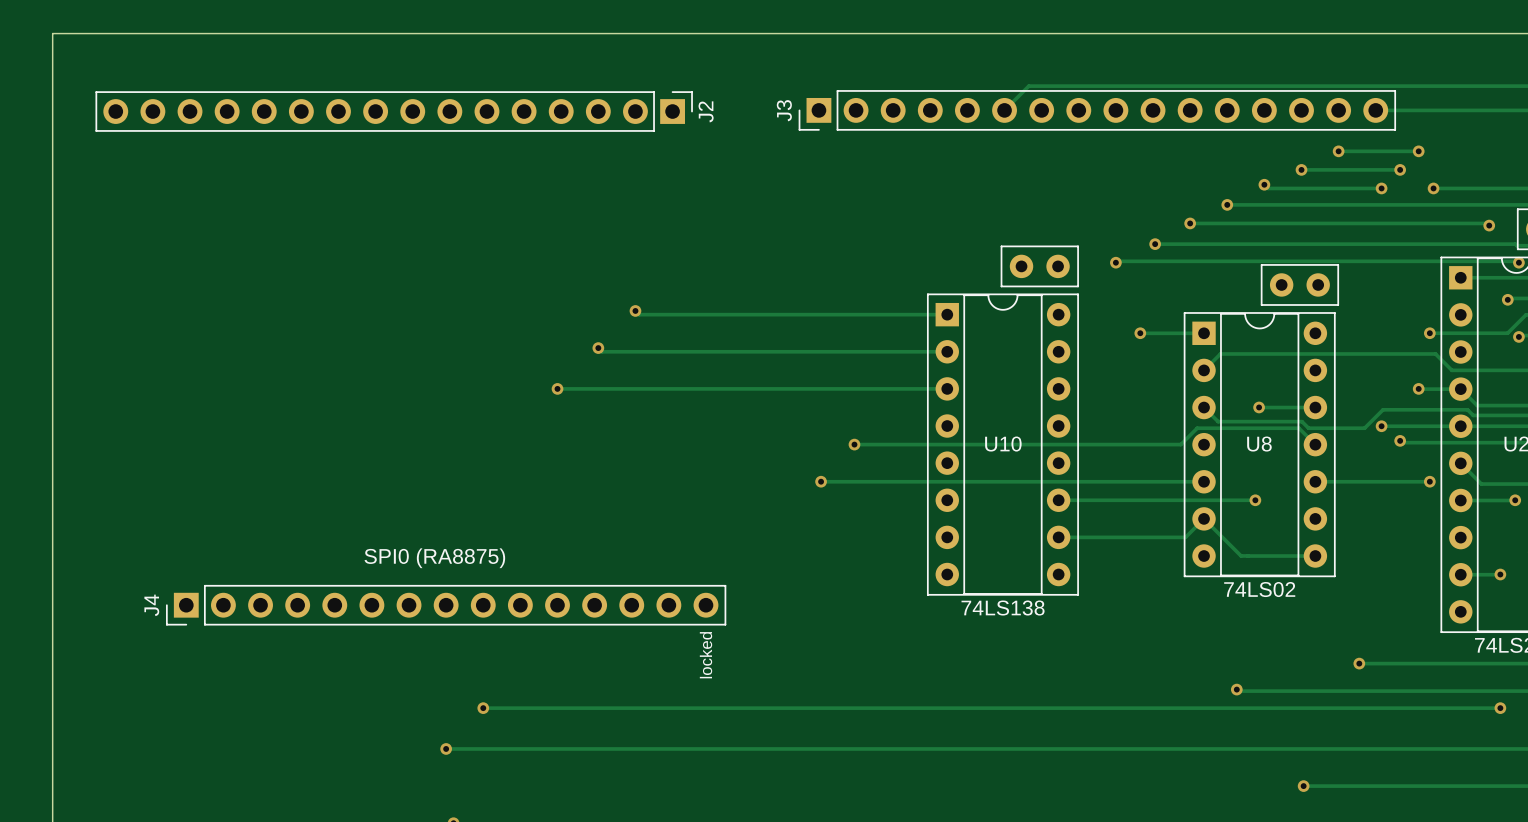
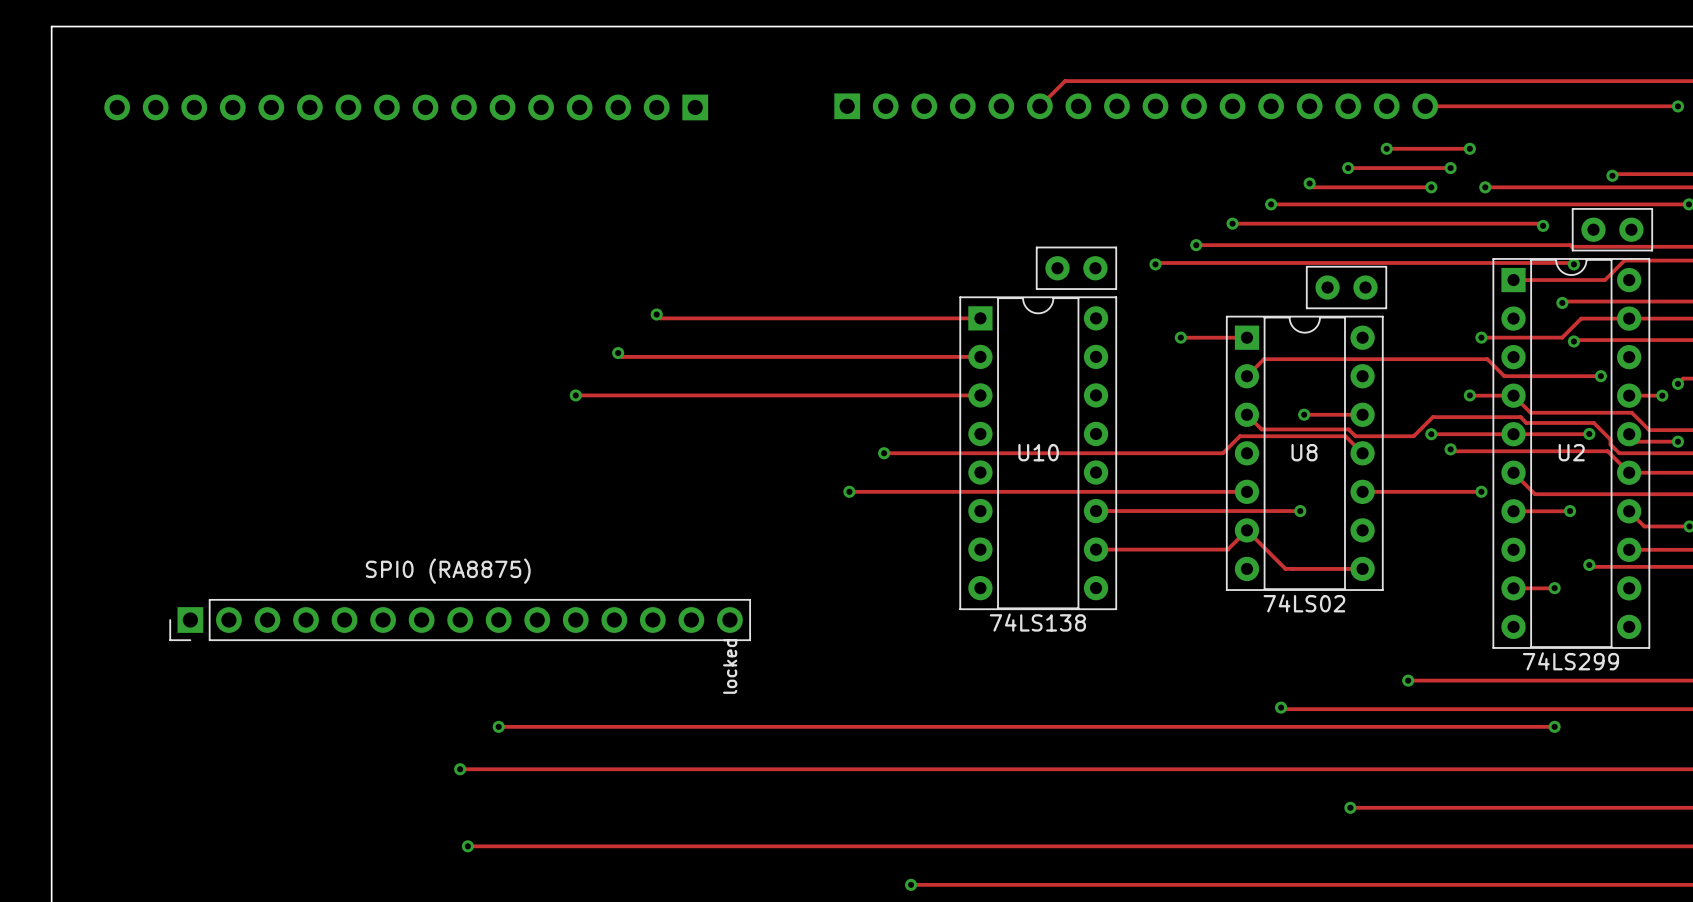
J3: (1097, 110) -> none
J2: (394, 111) -> none
J4 name: J4 (151, 605) -> none

